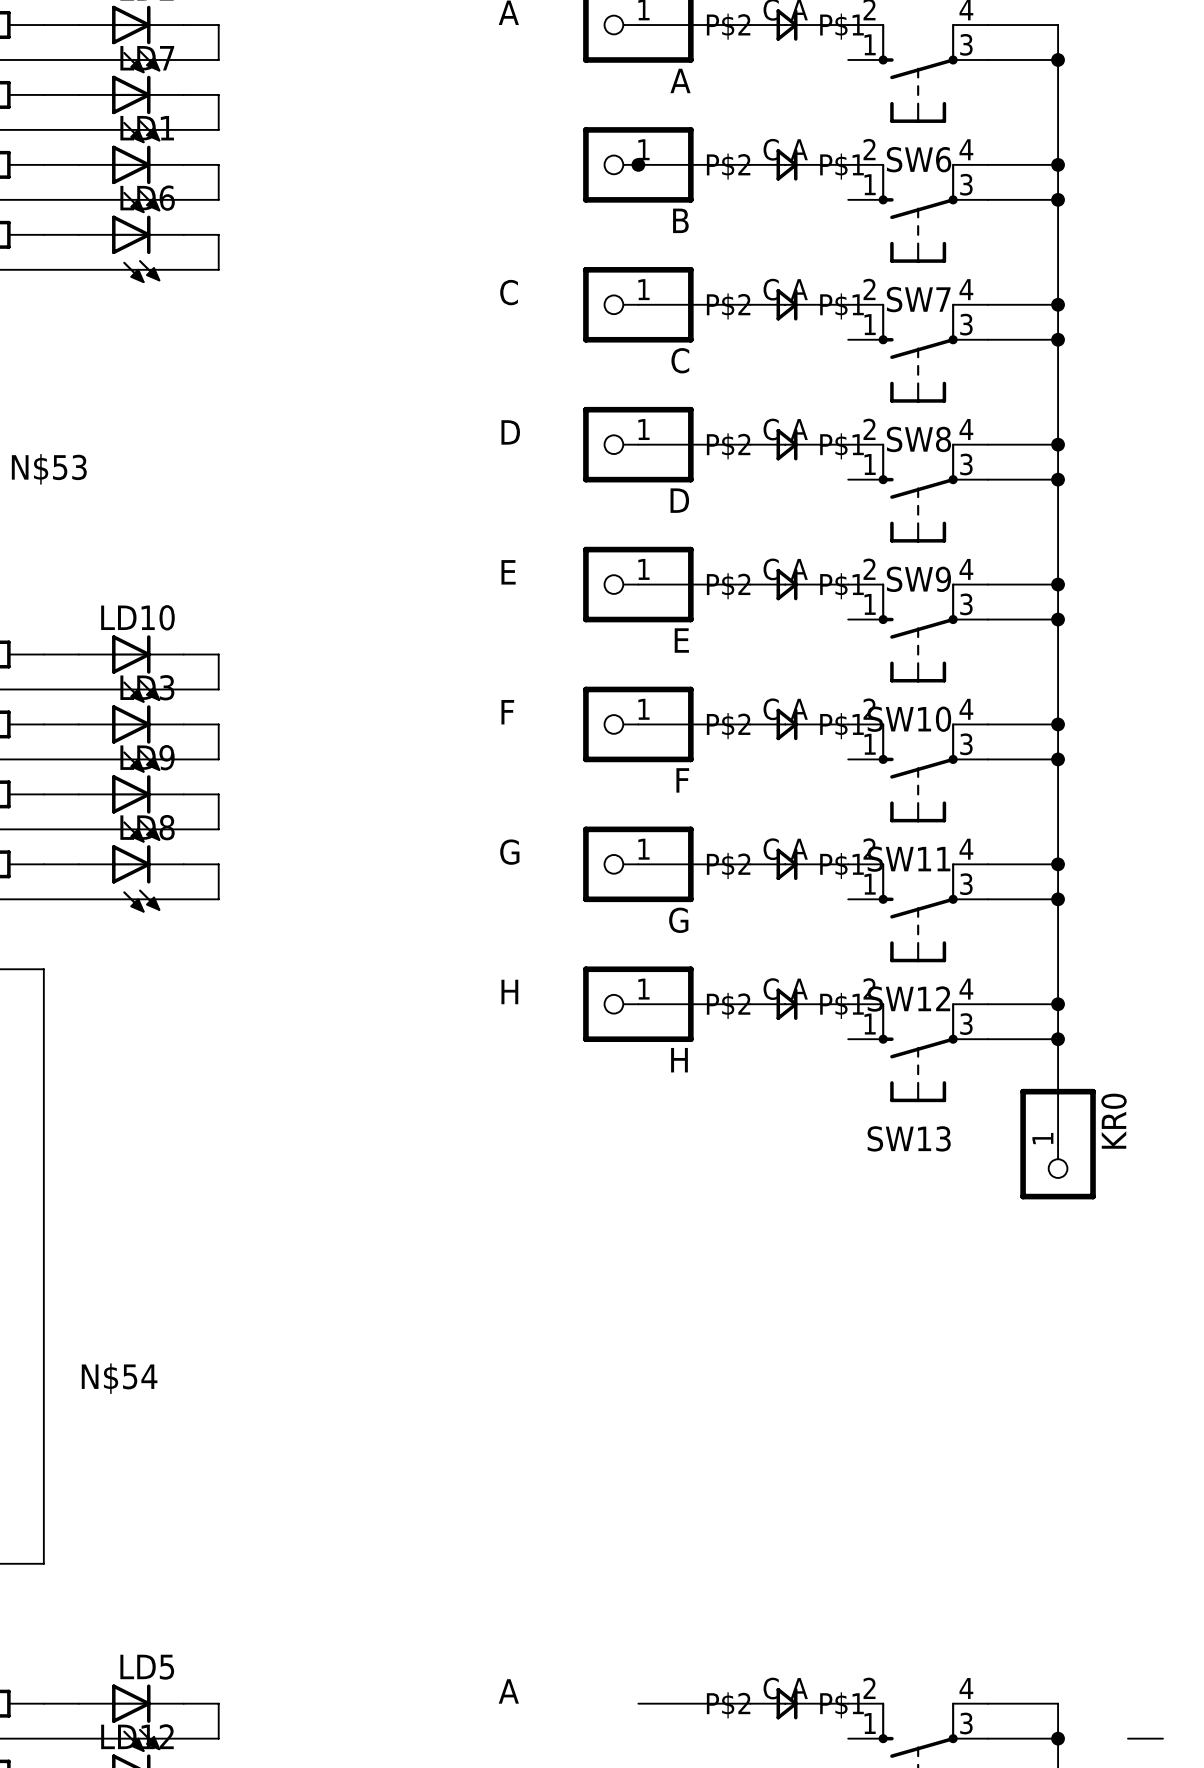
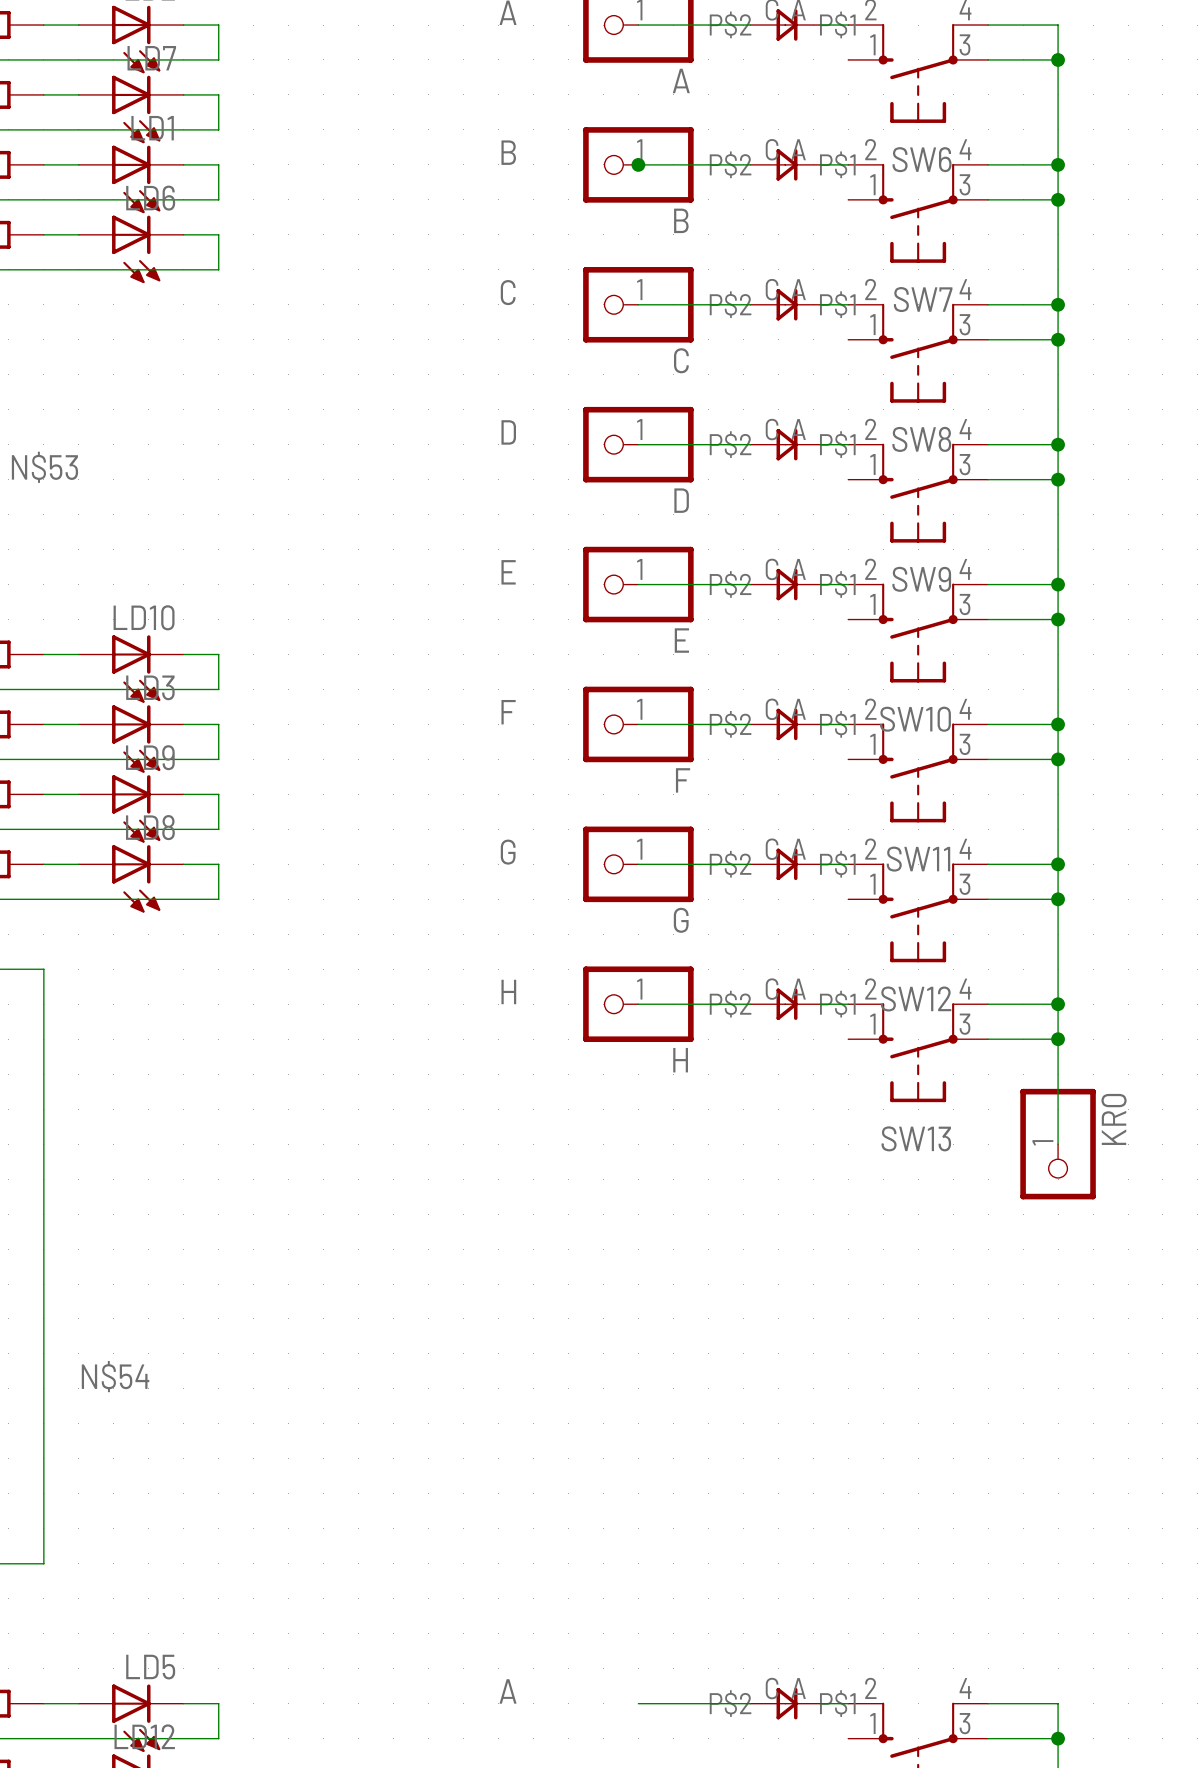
label: none -> B (508, 152)
wire: (1128, 1738) (1162, 1738) -> none

